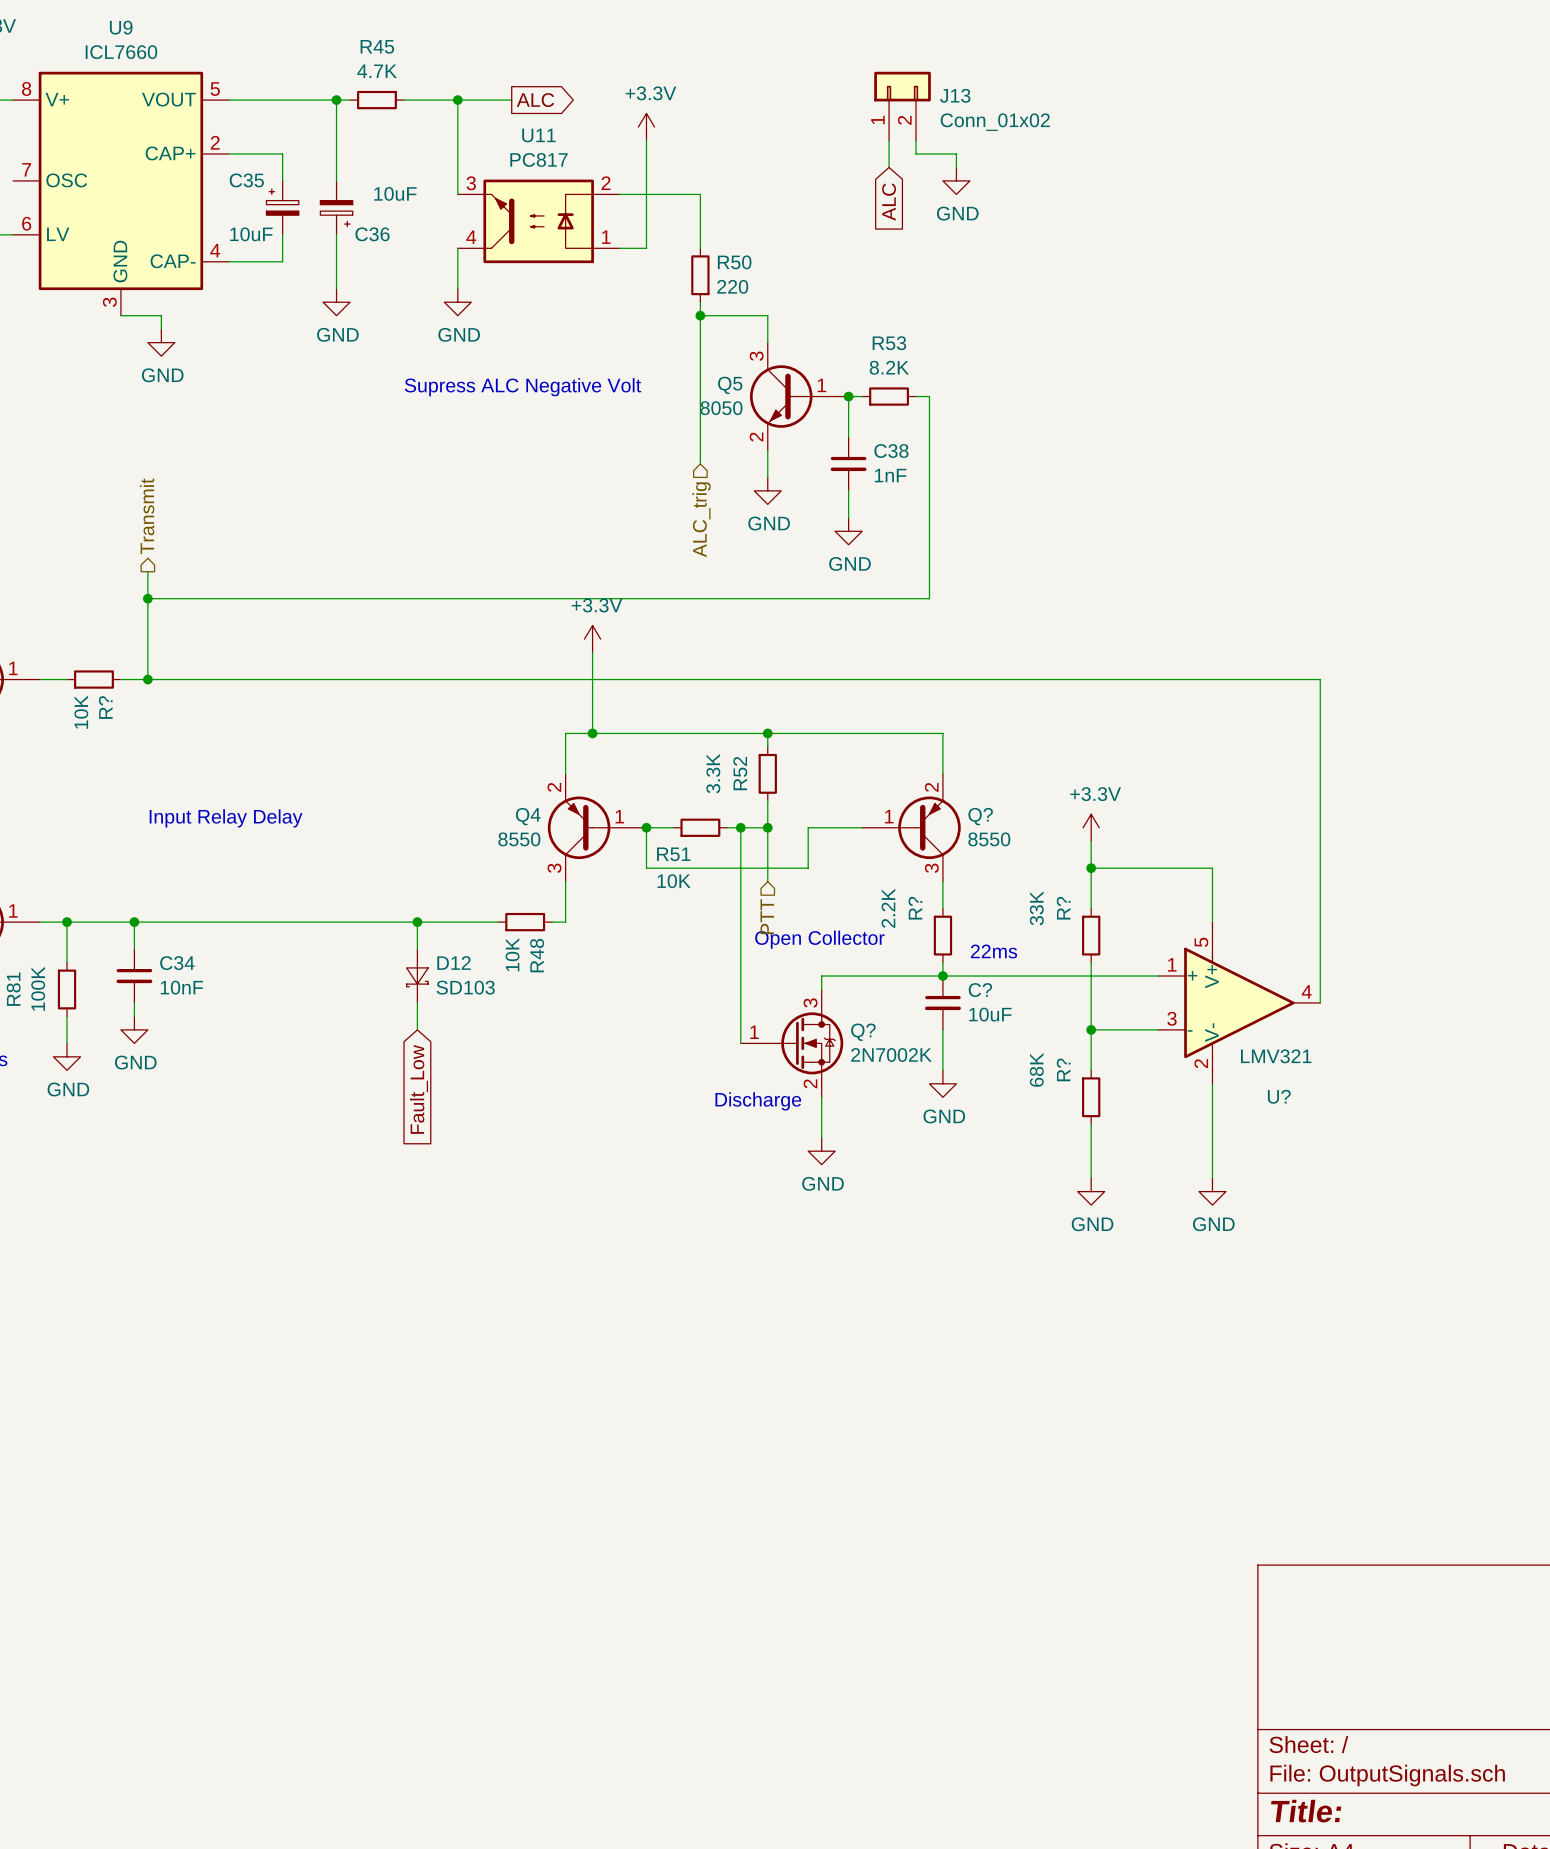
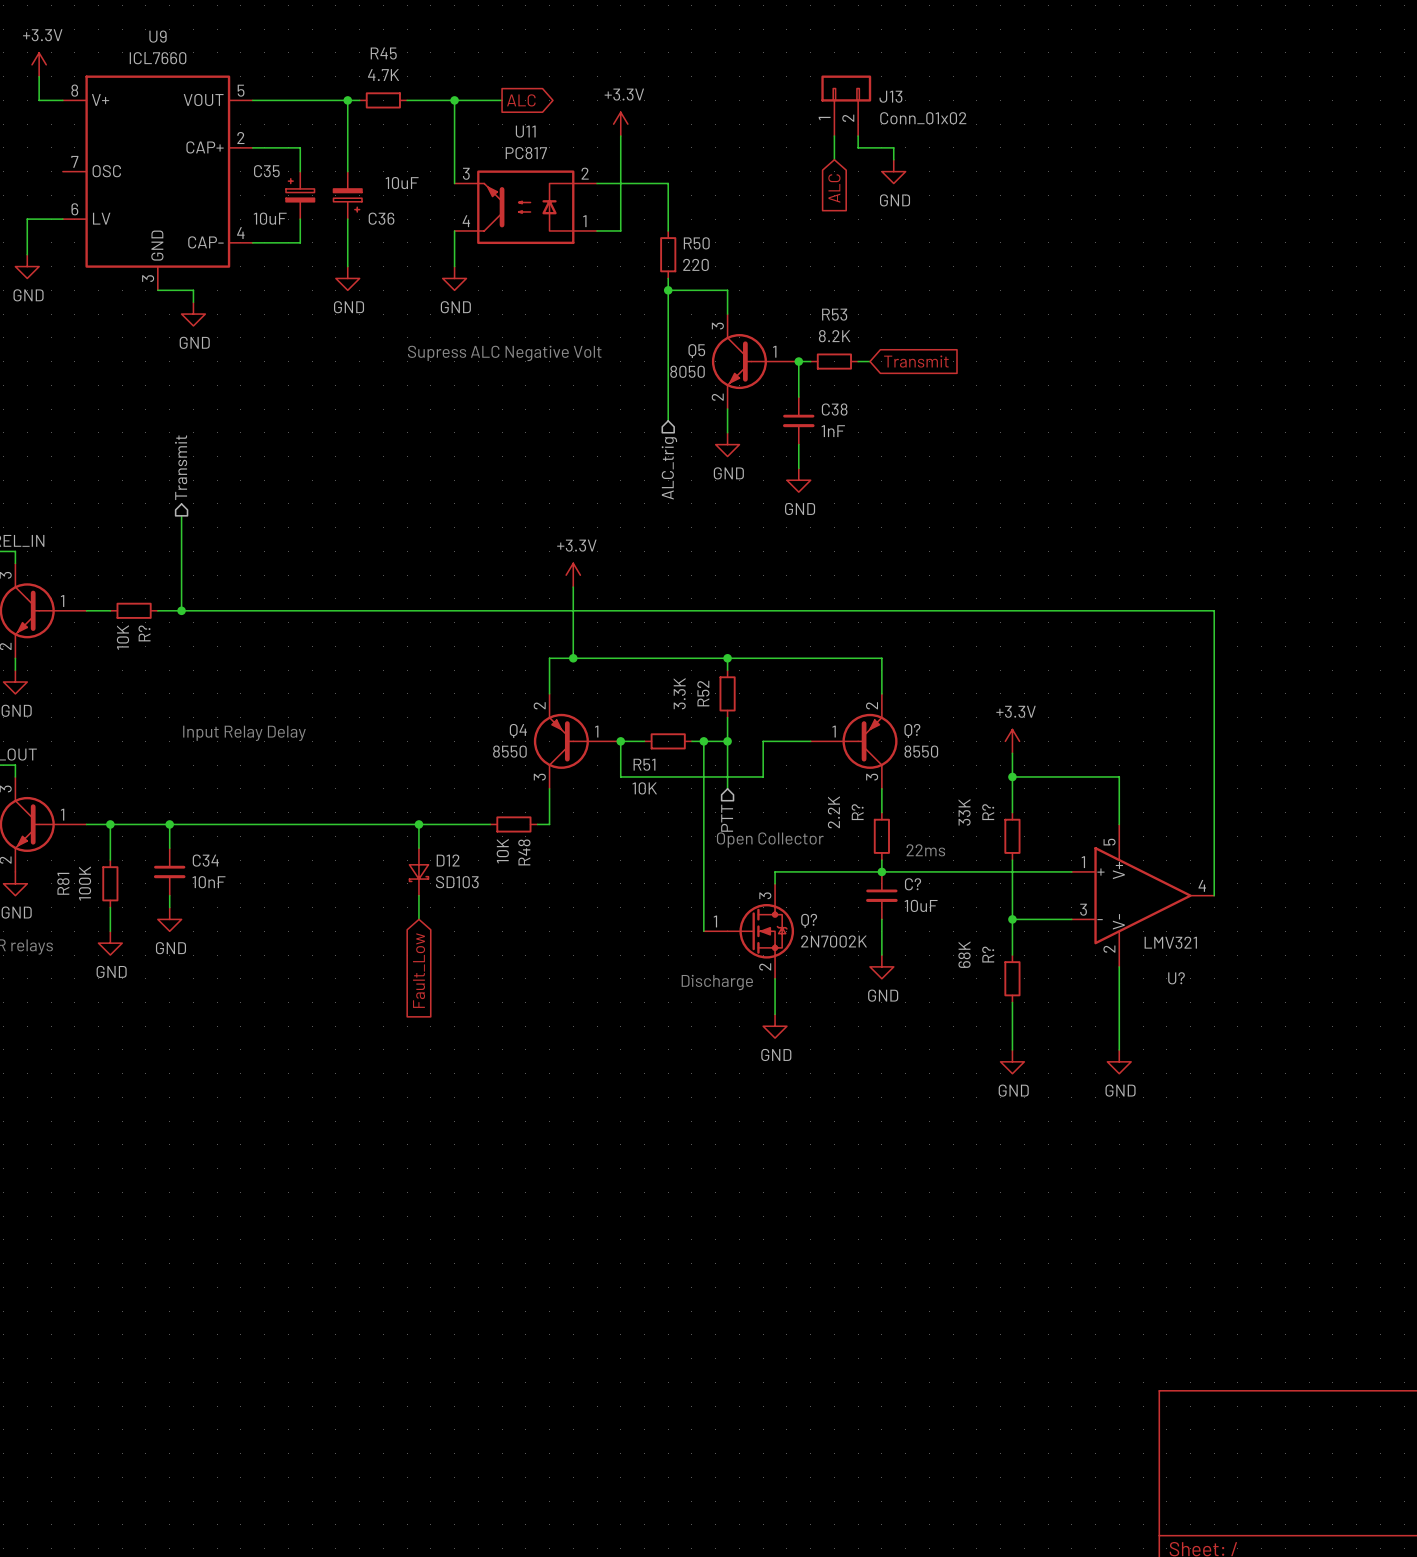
wire: (929, 396) (929, 598) (147, 598) -> none
global label: none -> Transmit (916, 361)
junction: (147, 598) -> none

